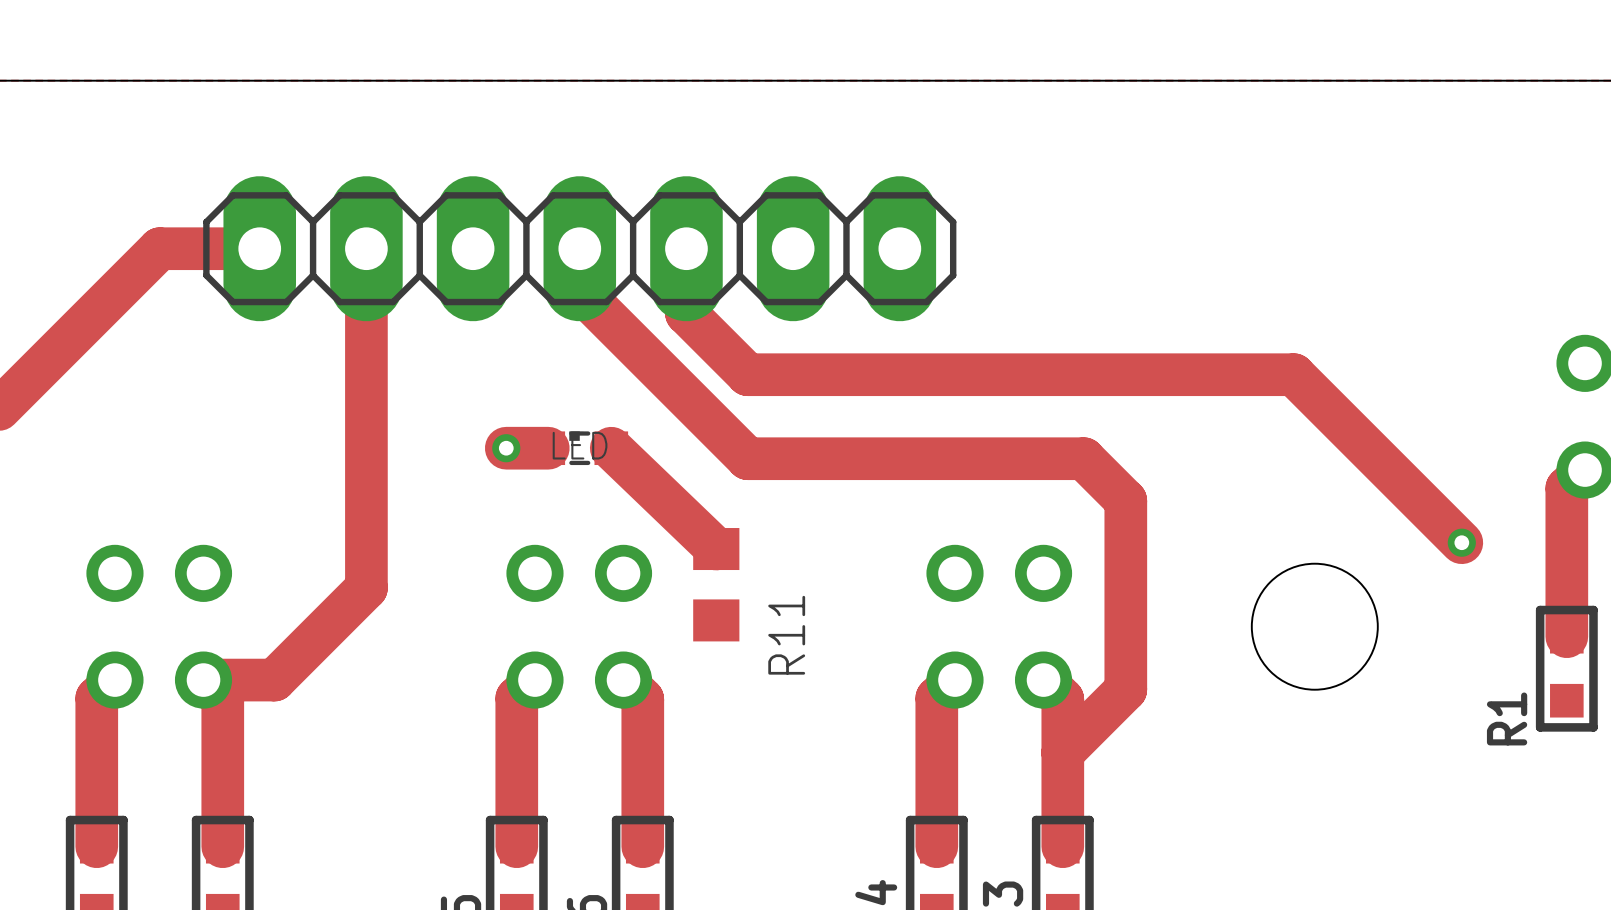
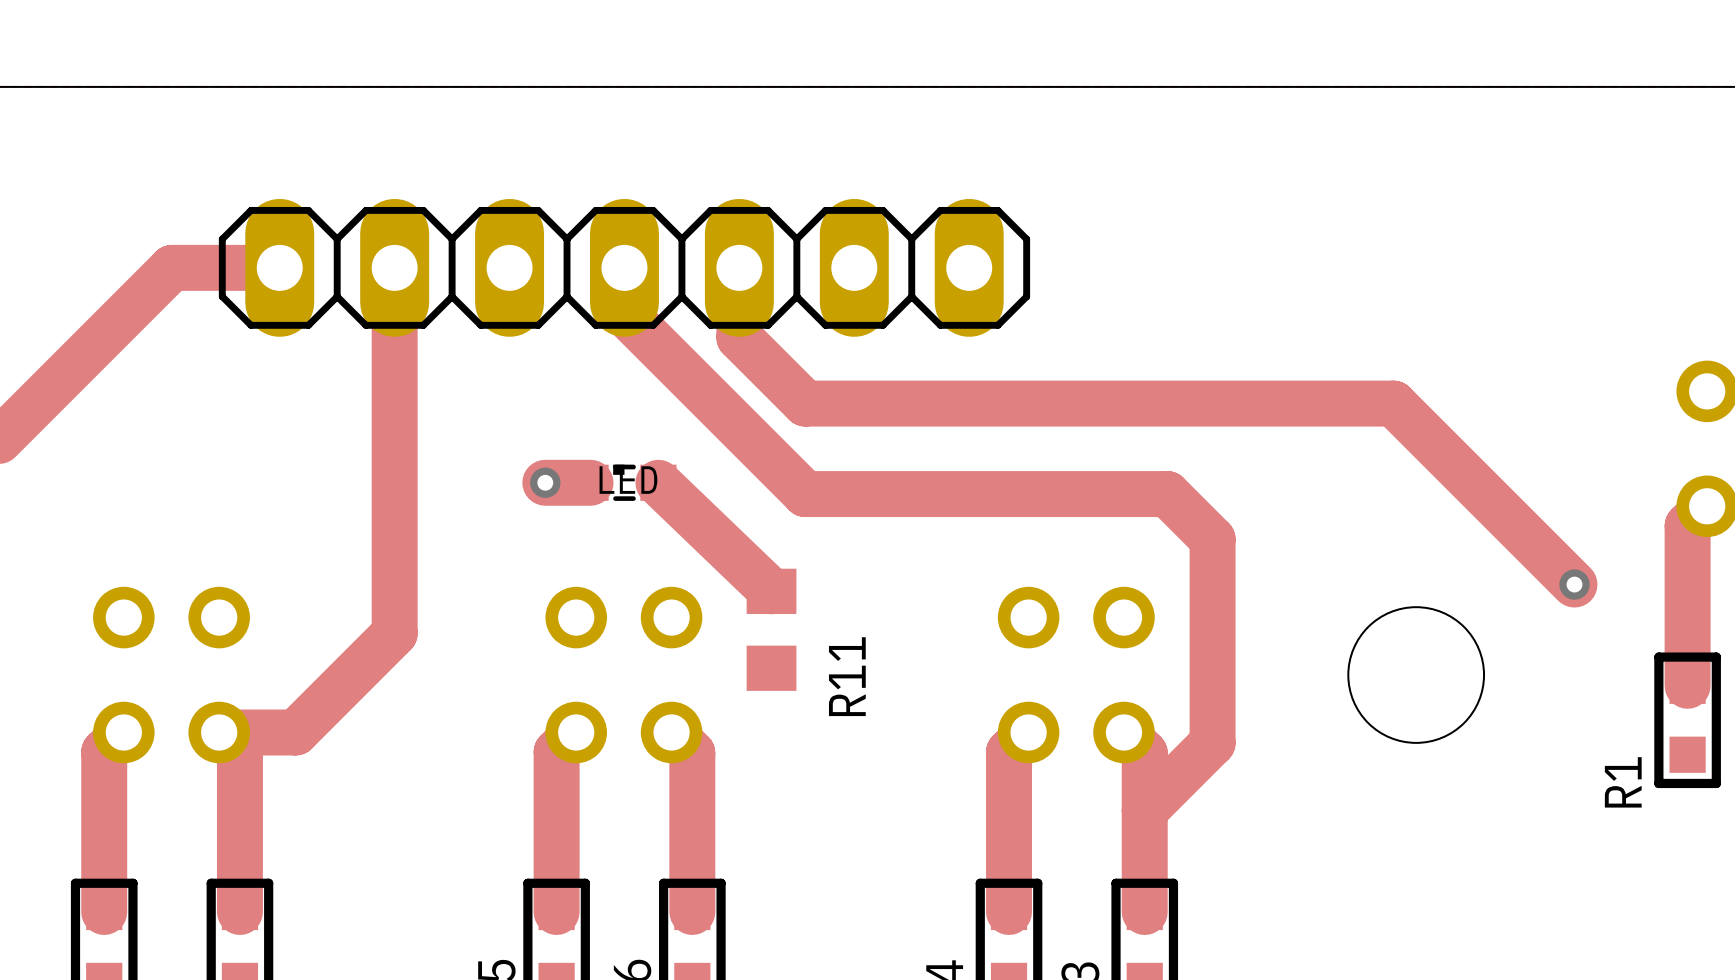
part footprint: [203, 176, 957, 322] -> [218, 198, 1031, 337]

